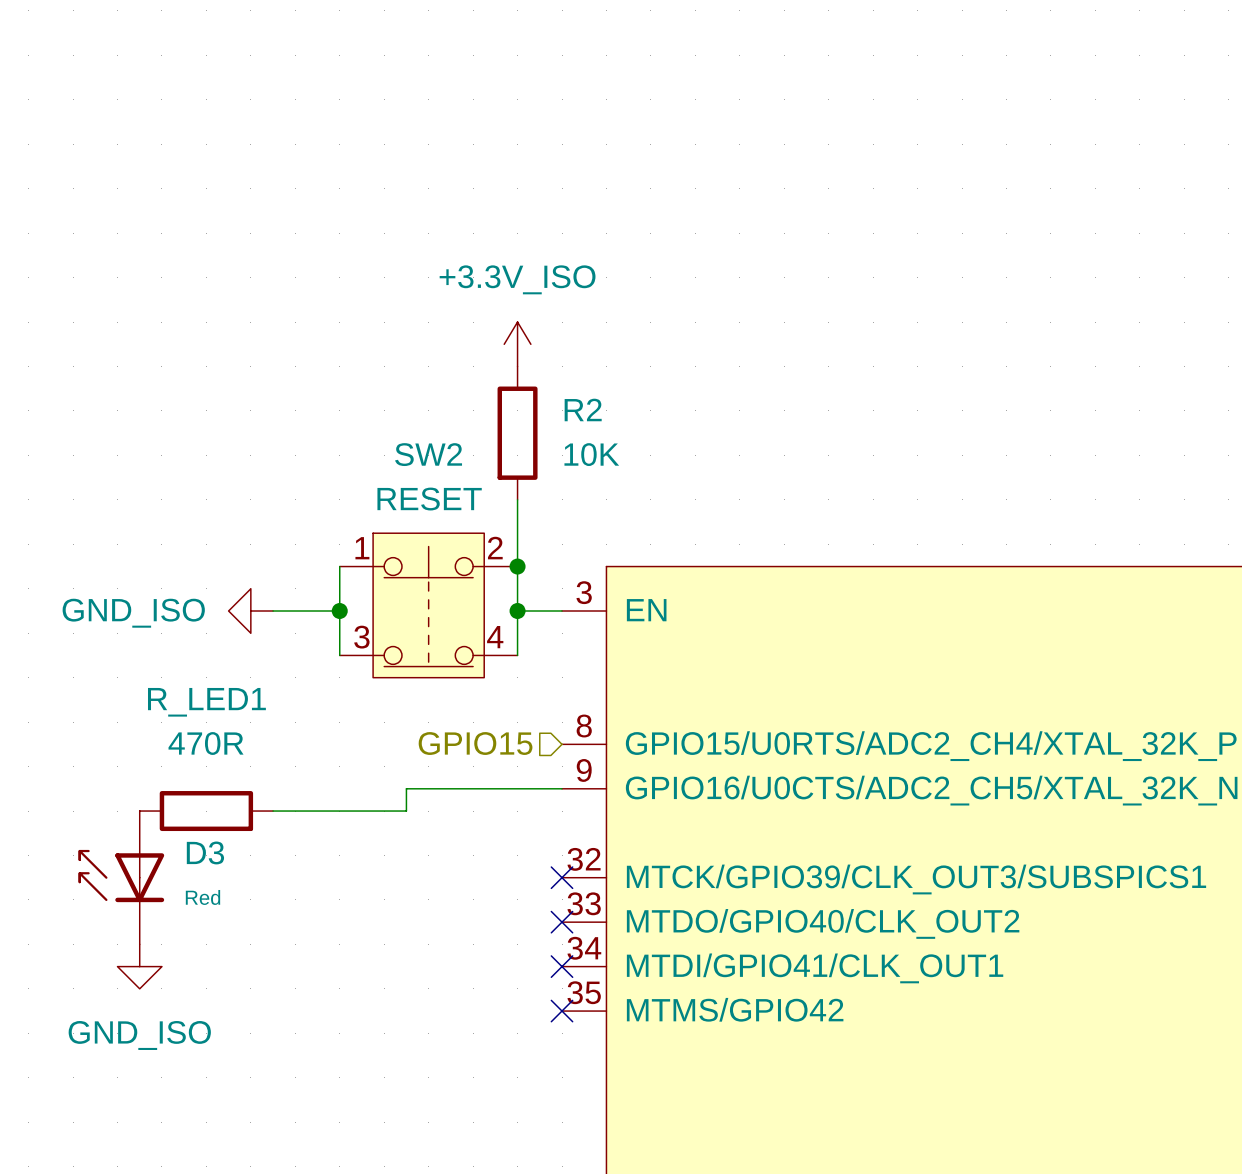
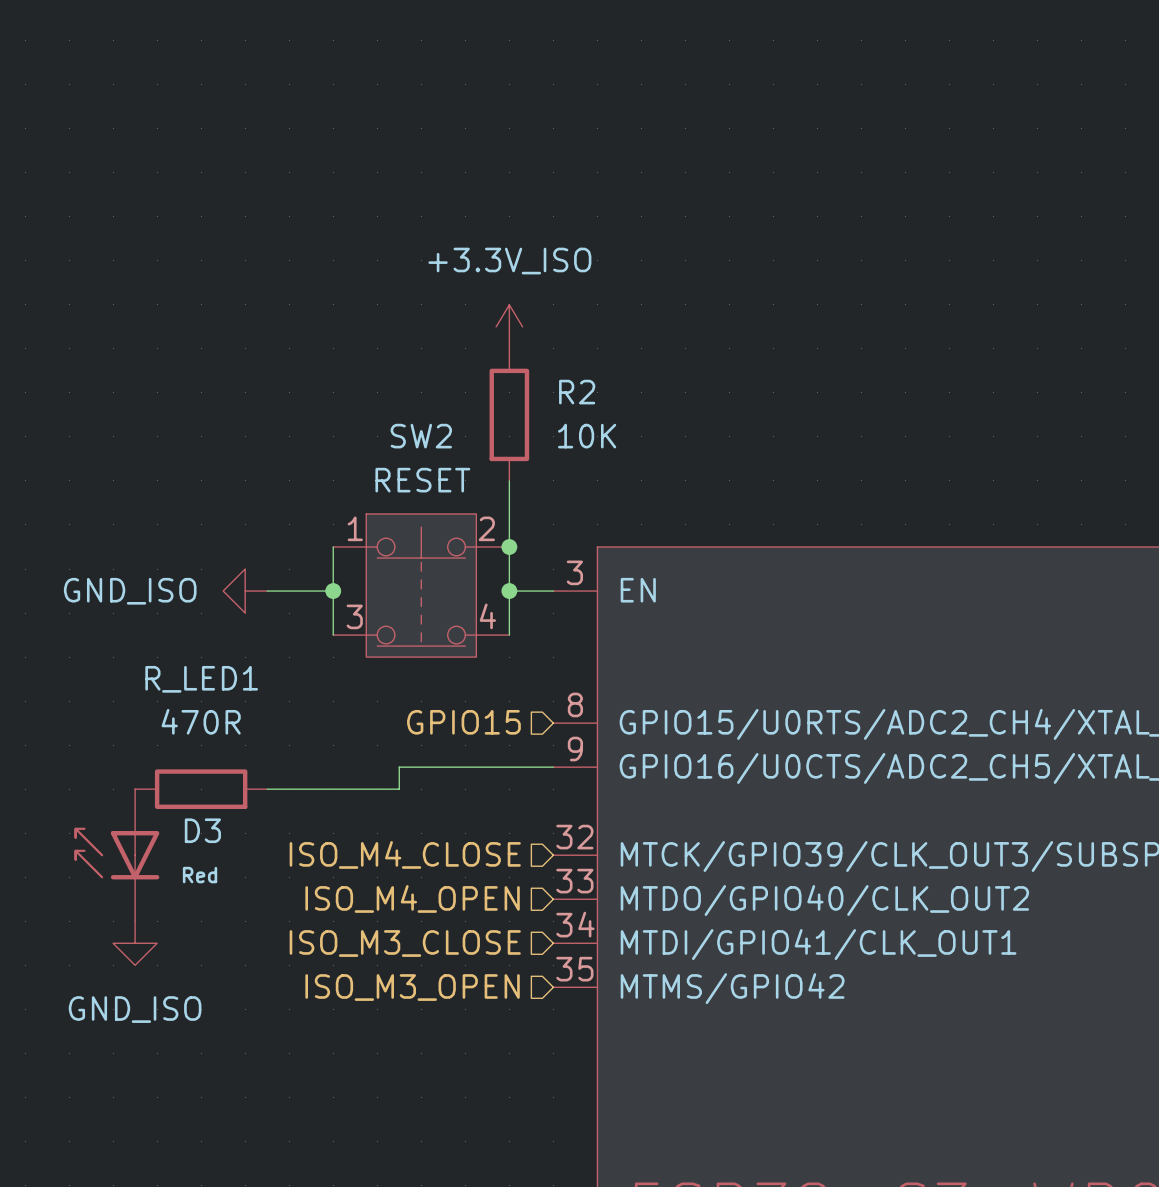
no-connect mark: (562, 877) -> none
hierarchical label: none -> ISO_M4_CLOSE (405, 854)
no-connect mark: (562, 922) -> none
hierarchical label: none -> ISO_M4_OPEN (412, 898)
no-connect mark: (562, 966) -> none
hierarchical label: none -> ISO_M3_CLOSE (405, 943)
no-connect mark: (562, 1011) -> none
hierarchical label: none -> ISO_M3_OPEN (412, 987)

